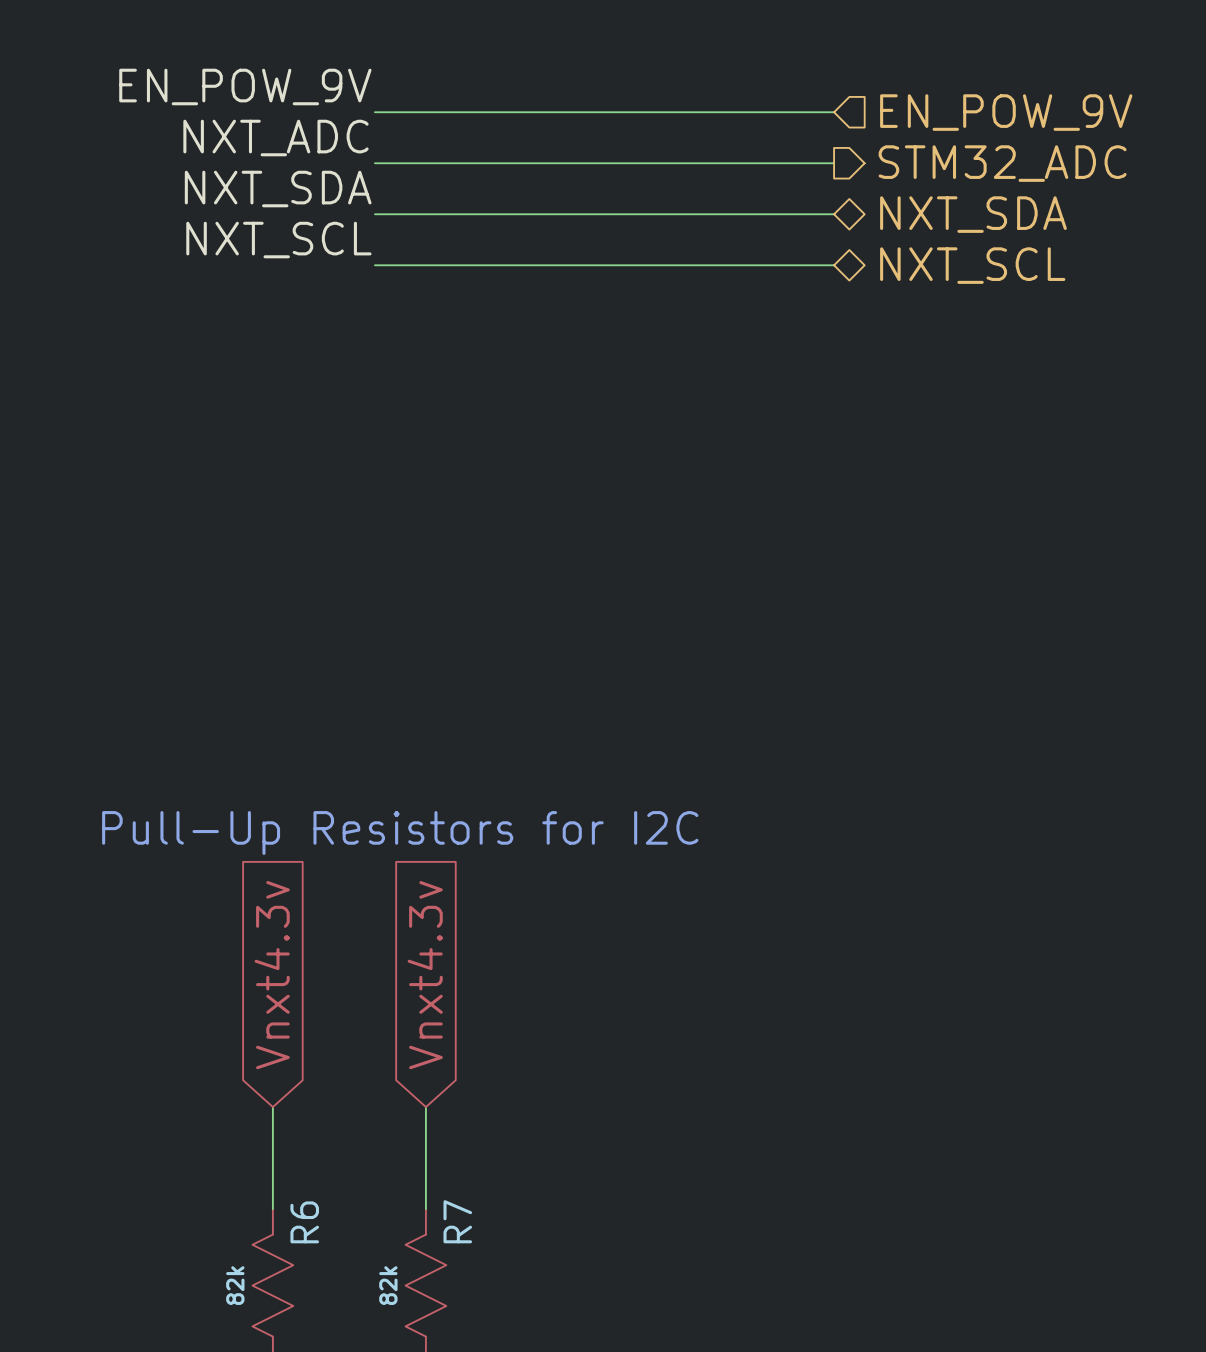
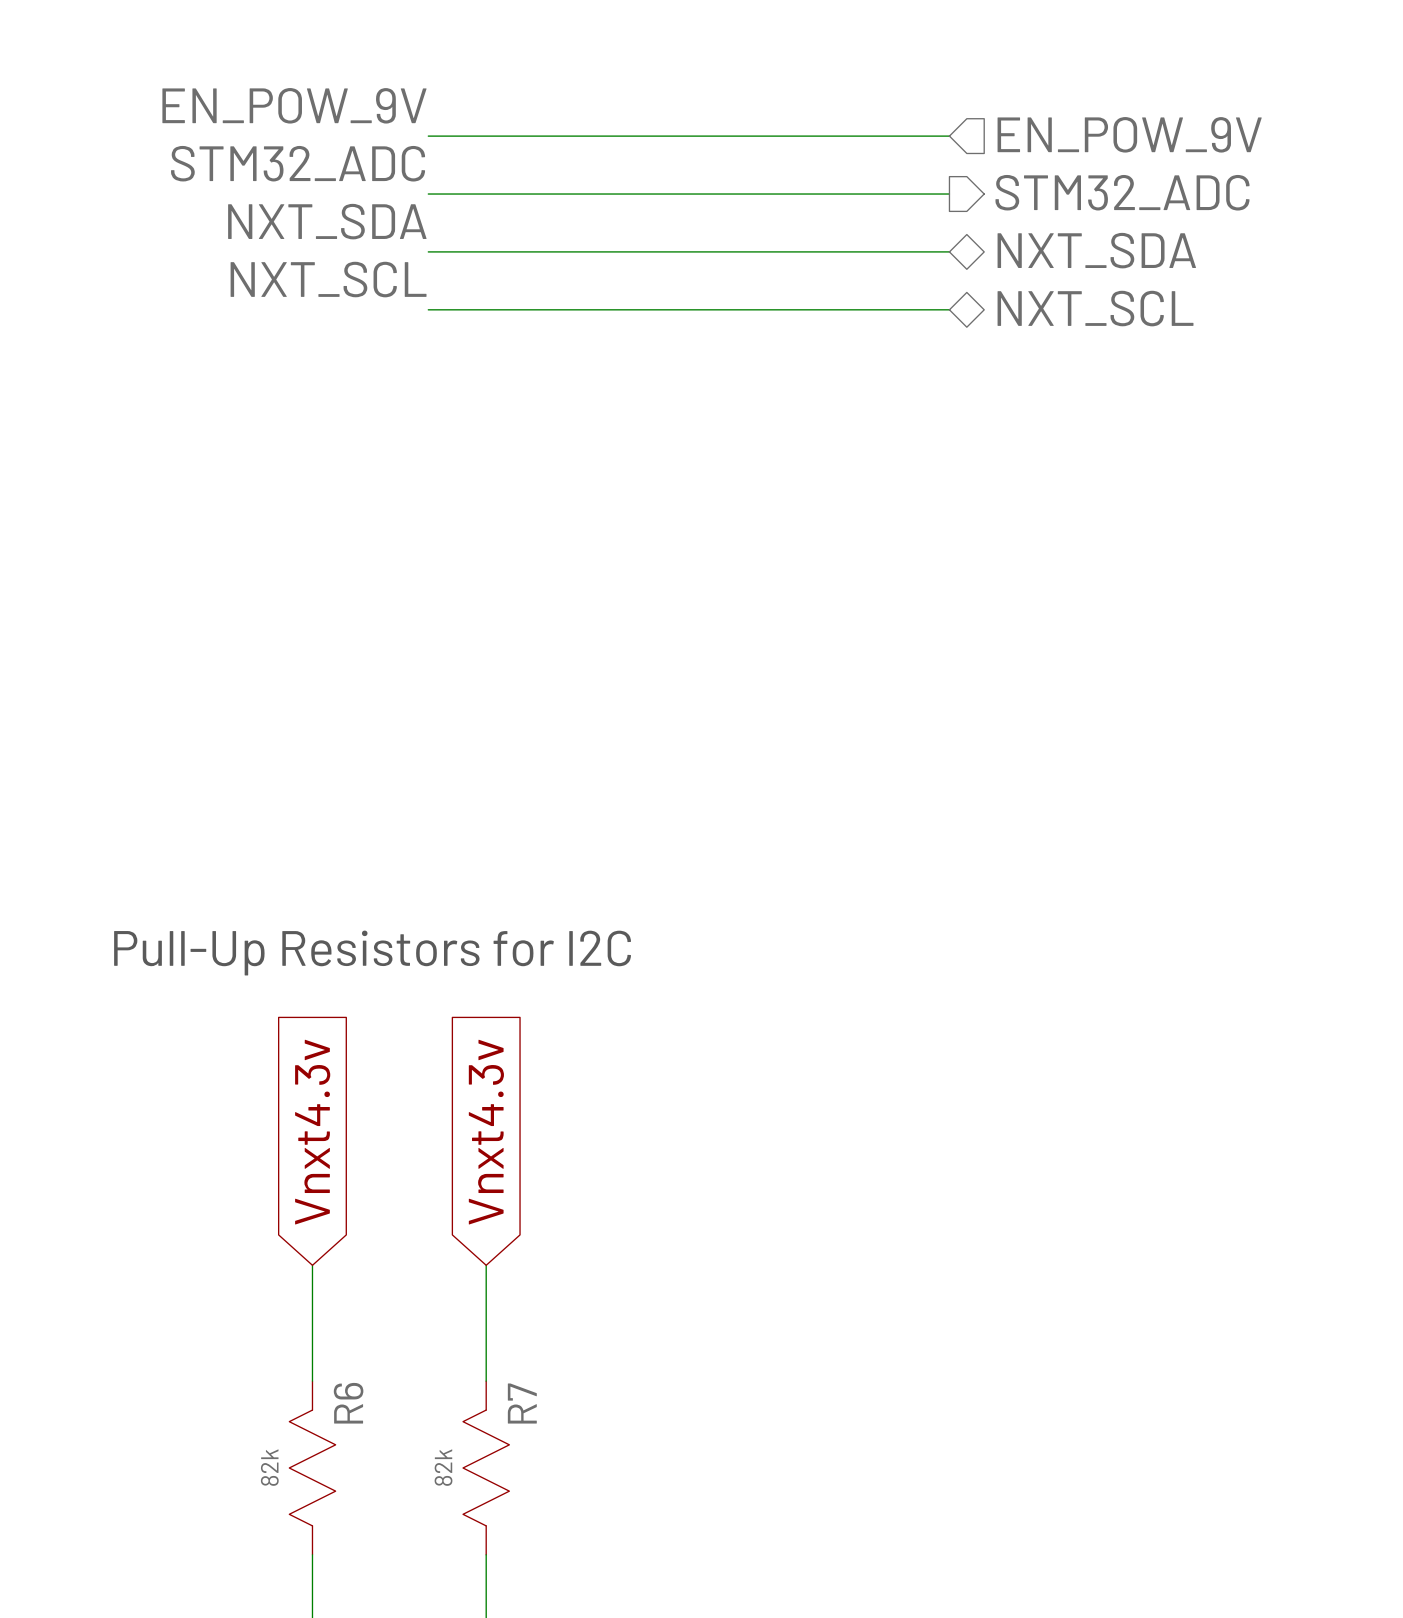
label: NXT_ADC (275, 138) -> STM32_ADC (298, 163)

